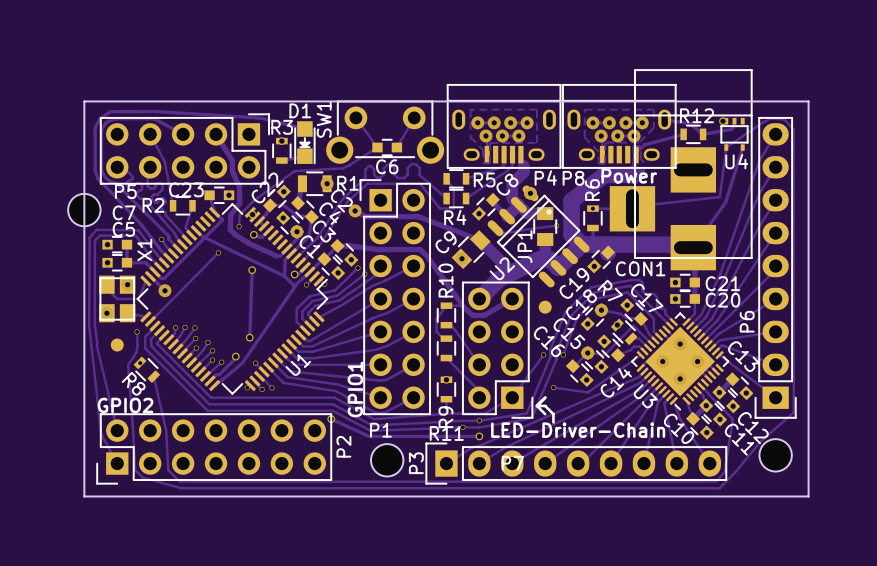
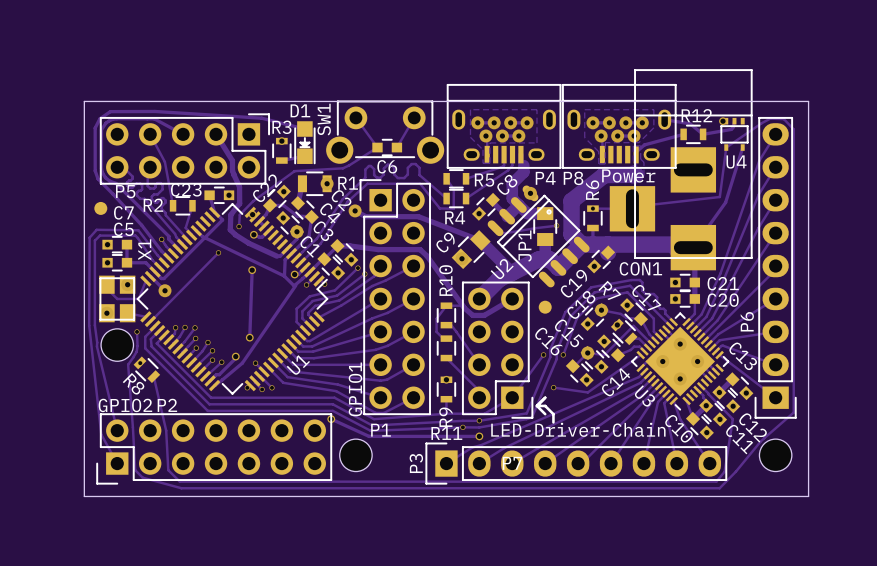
part: none -> (100, 208)
part: (84, 210) -> none
part footprint: [110, 338, 124, 352] -> [101, 328, 134, 362]
P2 name rotation: 0° (343, 446) -> 90° clockwise (167, 405)
P2 name position: P2 (343, 446) -> P2 (167, 405)
part position: (387, 460) -> (355, 455)

